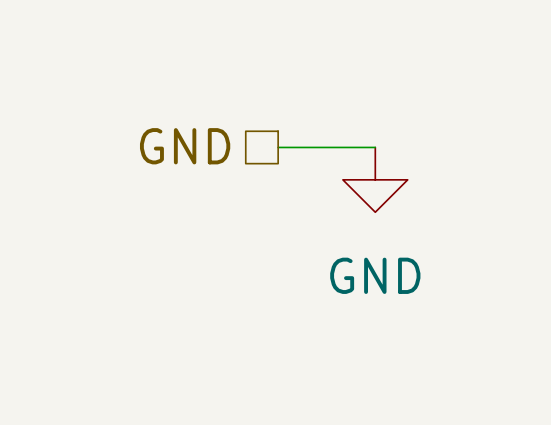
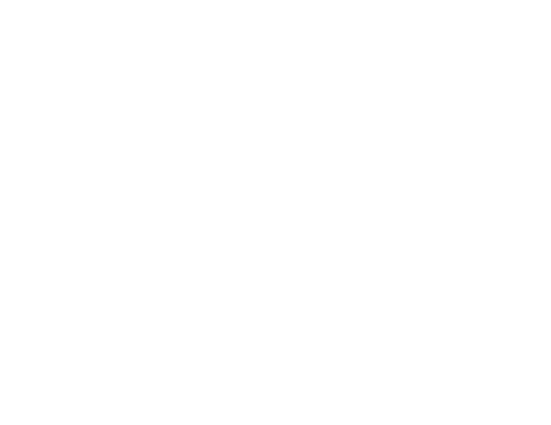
hierarchical label: GND (185, 146) -> none
wire: (278, 147) (375, 147) -> none
power symbol: GND (375, 179) -> none

